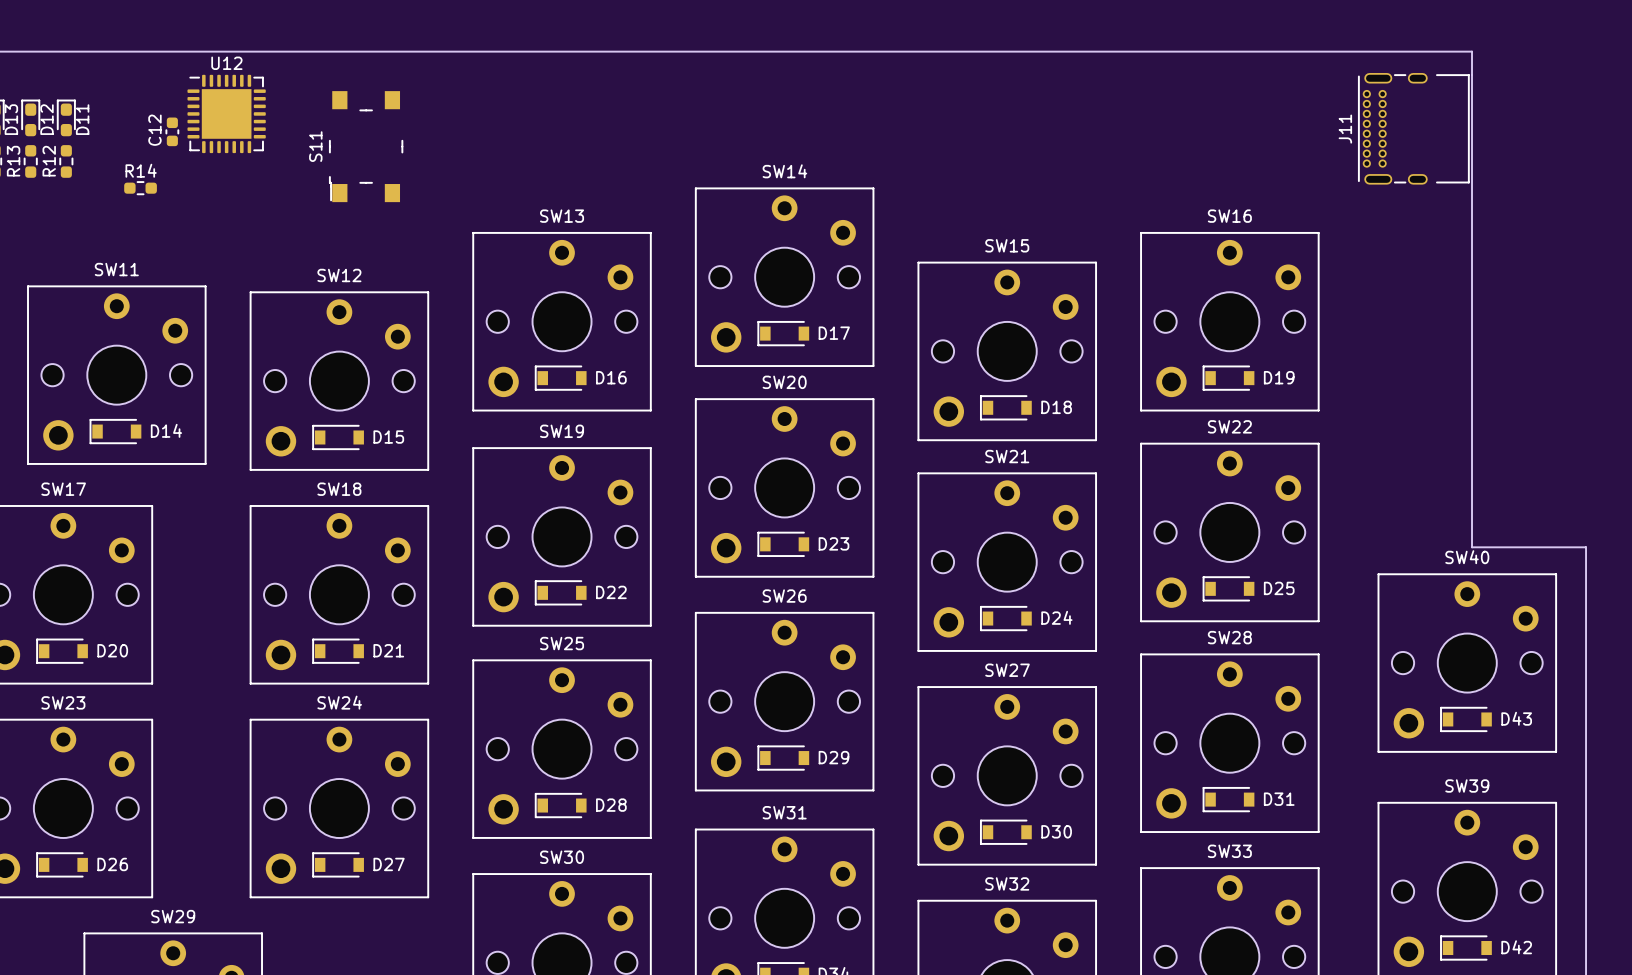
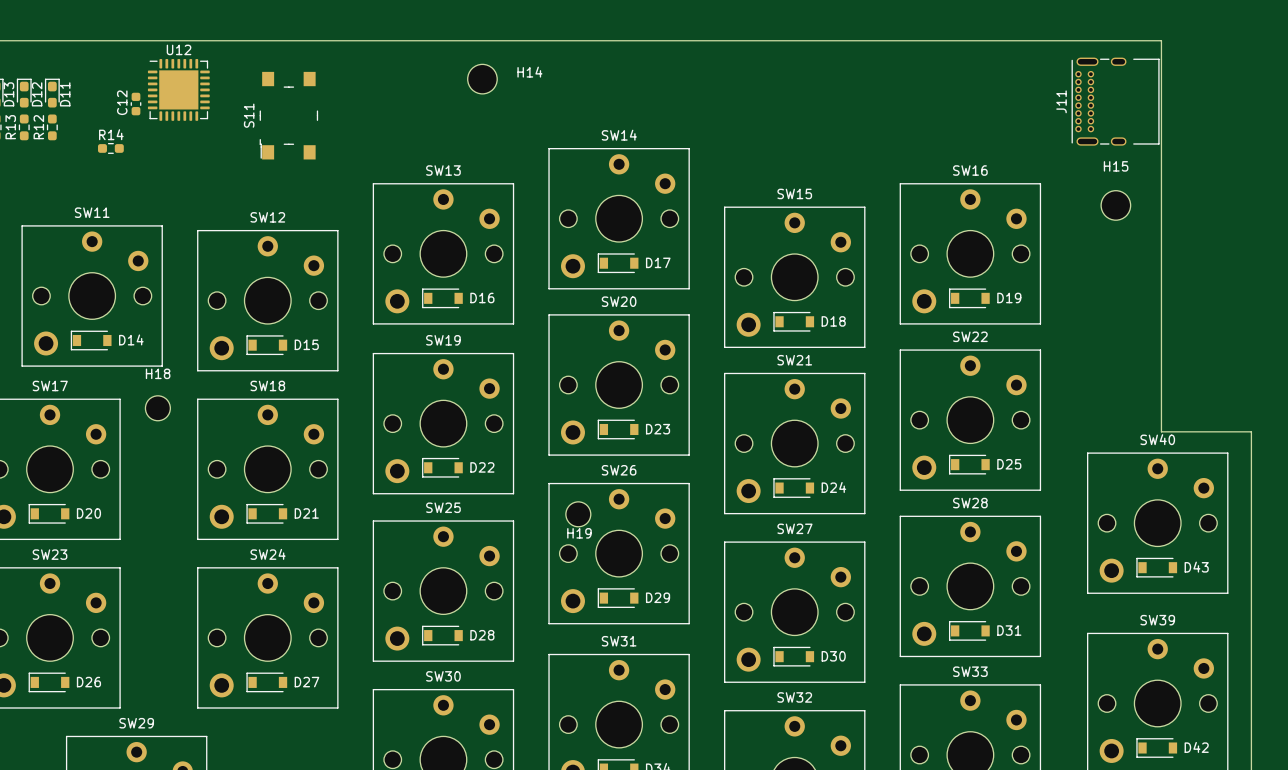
H14: none -> (482, 79)
H15: none -> (1115, 205)
H18: none -> (157, 408)
H19: none -> (578, 514)

